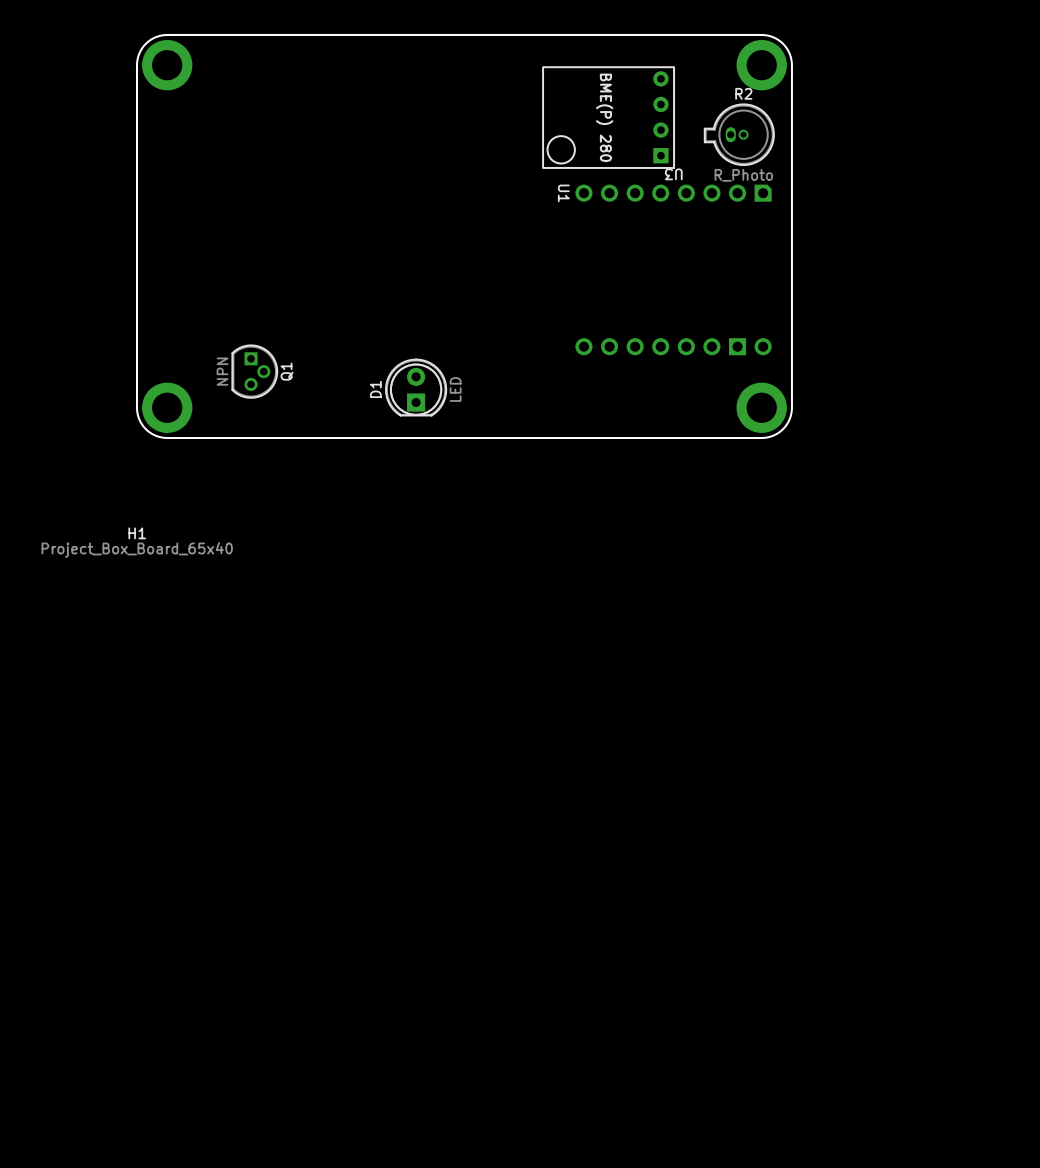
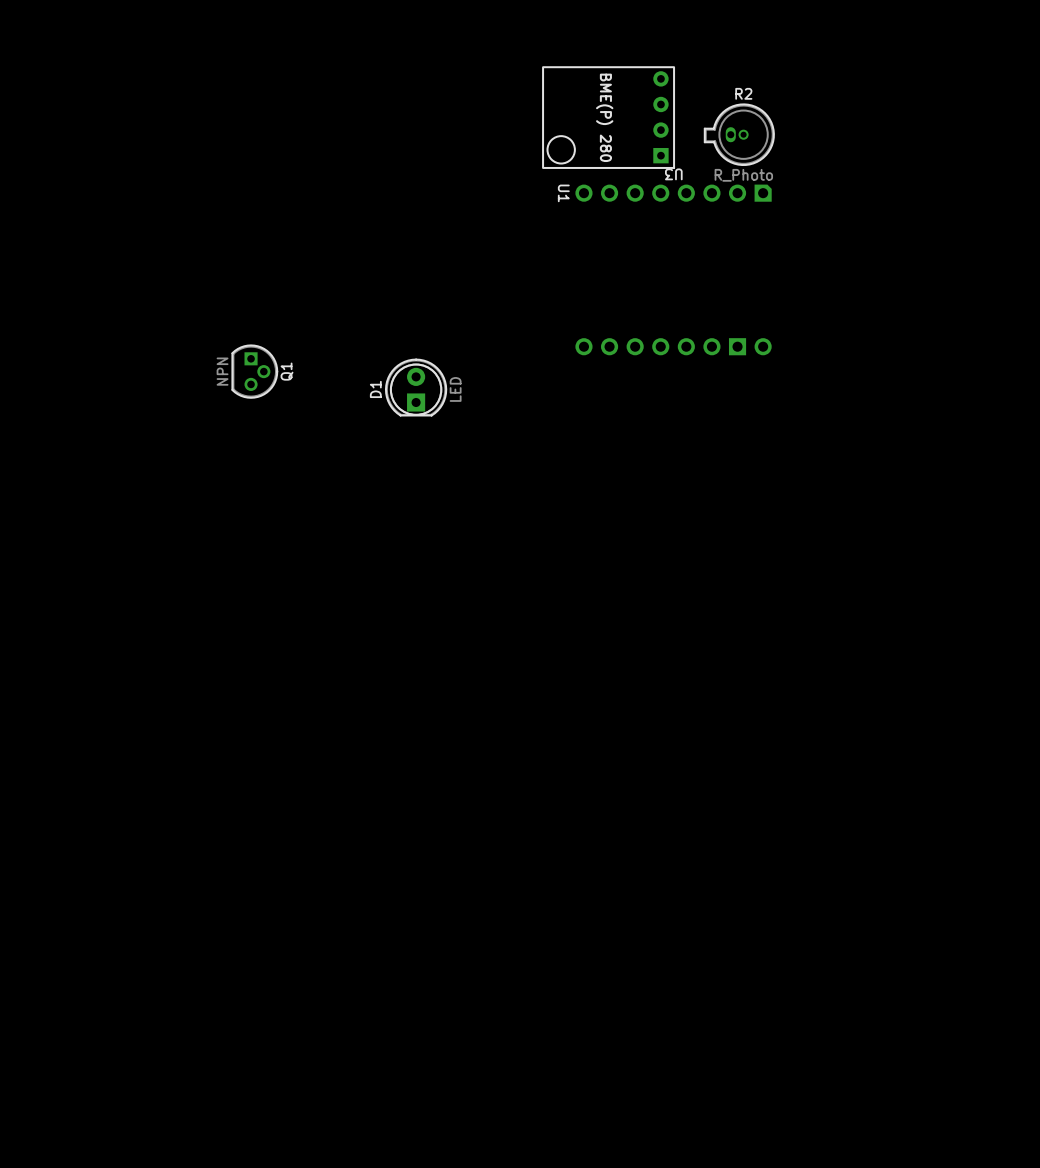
H1: Project_Box_Board_65x40 (464, 236) -> none

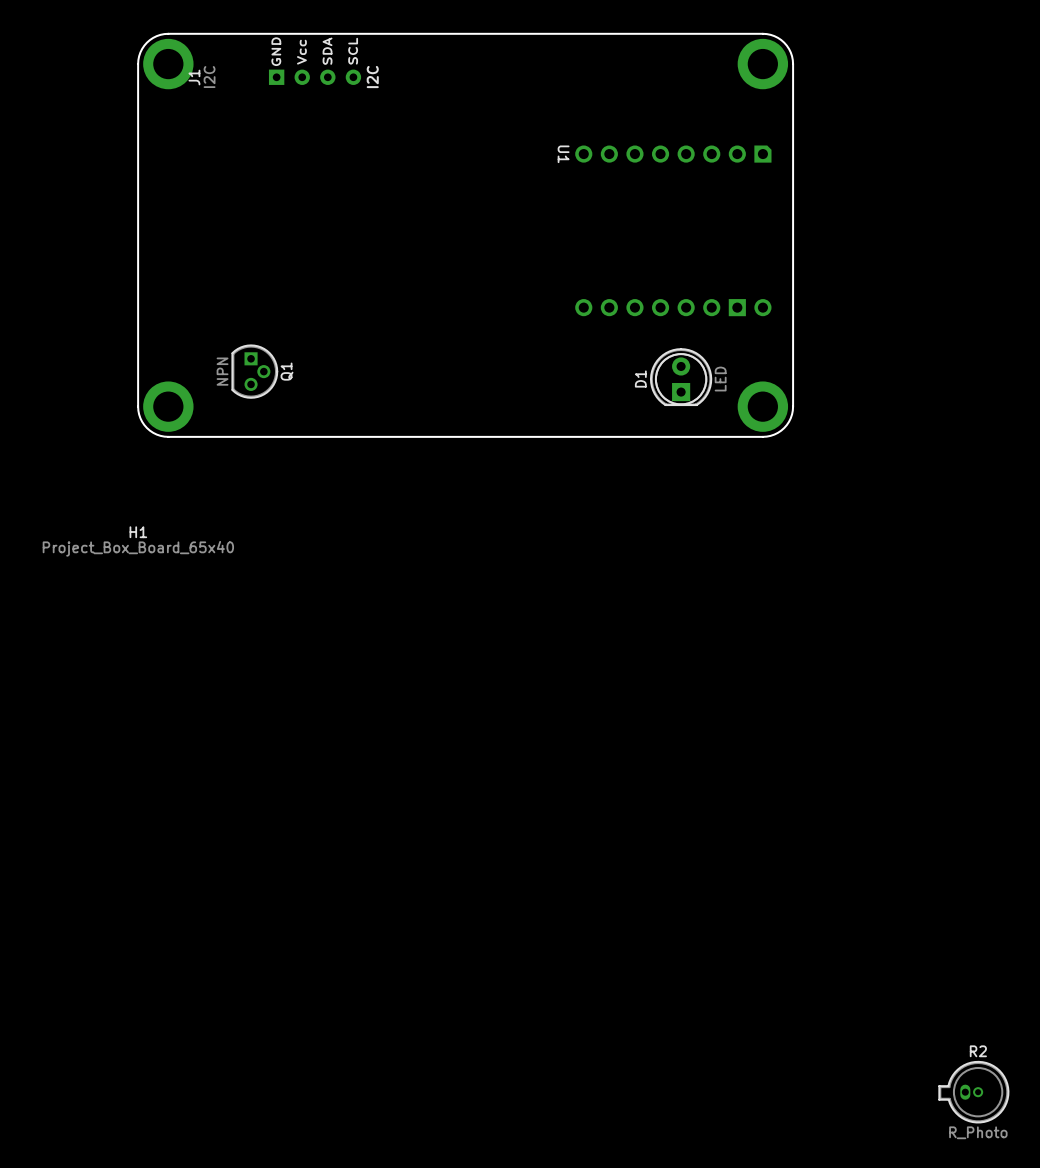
J1: none -> I2C (315, 77)
U3: (608, 117) -> none
R2 position: (739, 134) -> (973, 1092)
H1: none -> Project_Box_Board_65x40 (465, 235)
U1 position: (673, 269) -> (673, 230)
D1 position: (416, 387) -> (681, 377)

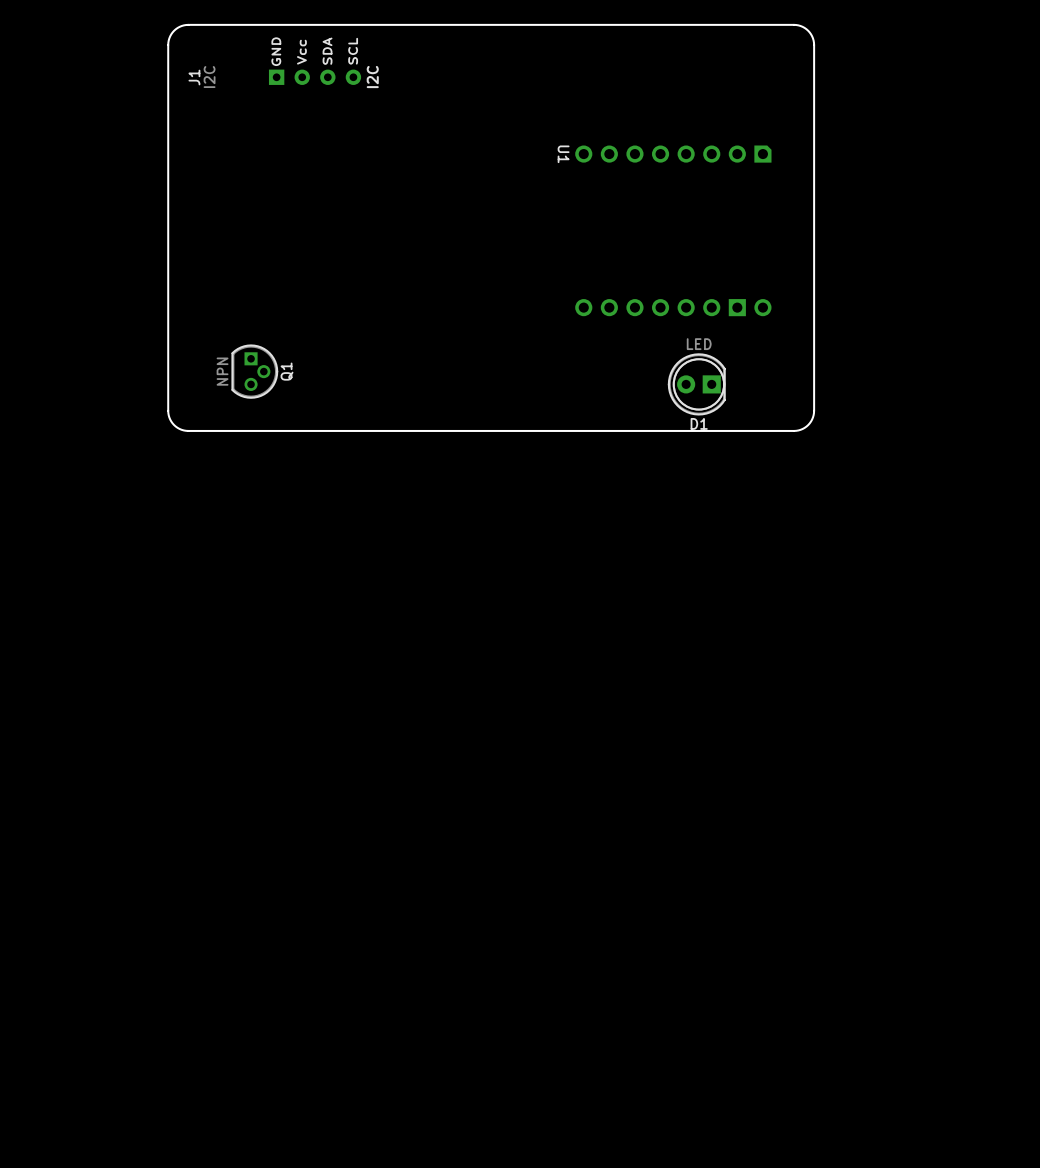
board edge: none -> (188, 24) (793, 24) (804, 27) (812, 36) (814, 45) (814, 410) (811, 421) (802, 428) (793, 430) (188, 430) (177, 427) (171, 421) (168, 410) (168, 45) (170, 36) (174, 30) (179, 26) (188, 24)
H1: Project_Box_Board_65x40 (465, 235) -> none
D1 rotation: 0° (681, 377) -> 90° counterclockwise (696, 384)
R2: R_Photo (973, 1092) -> none

